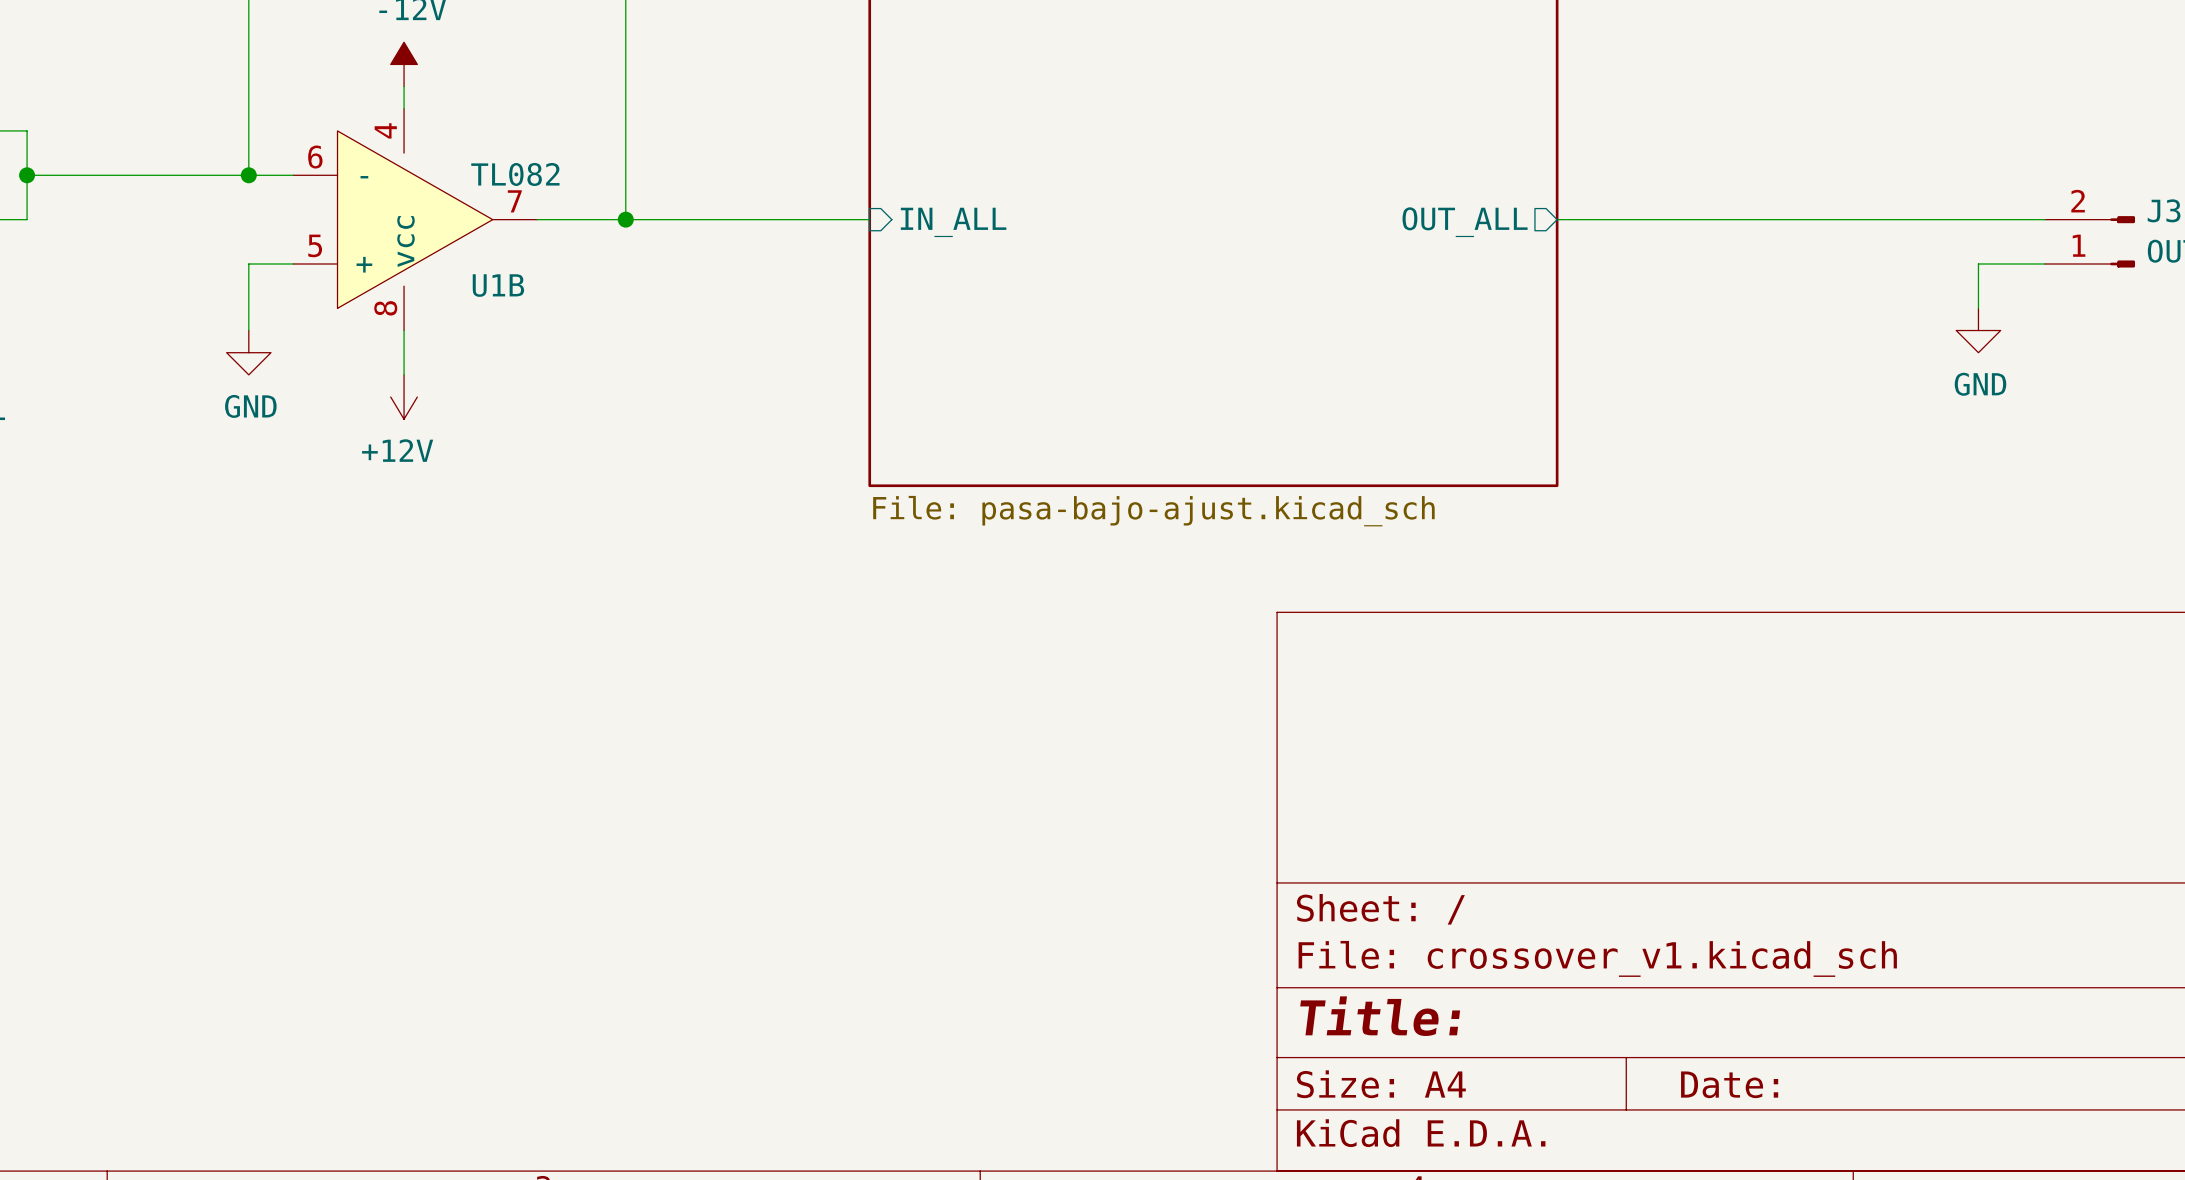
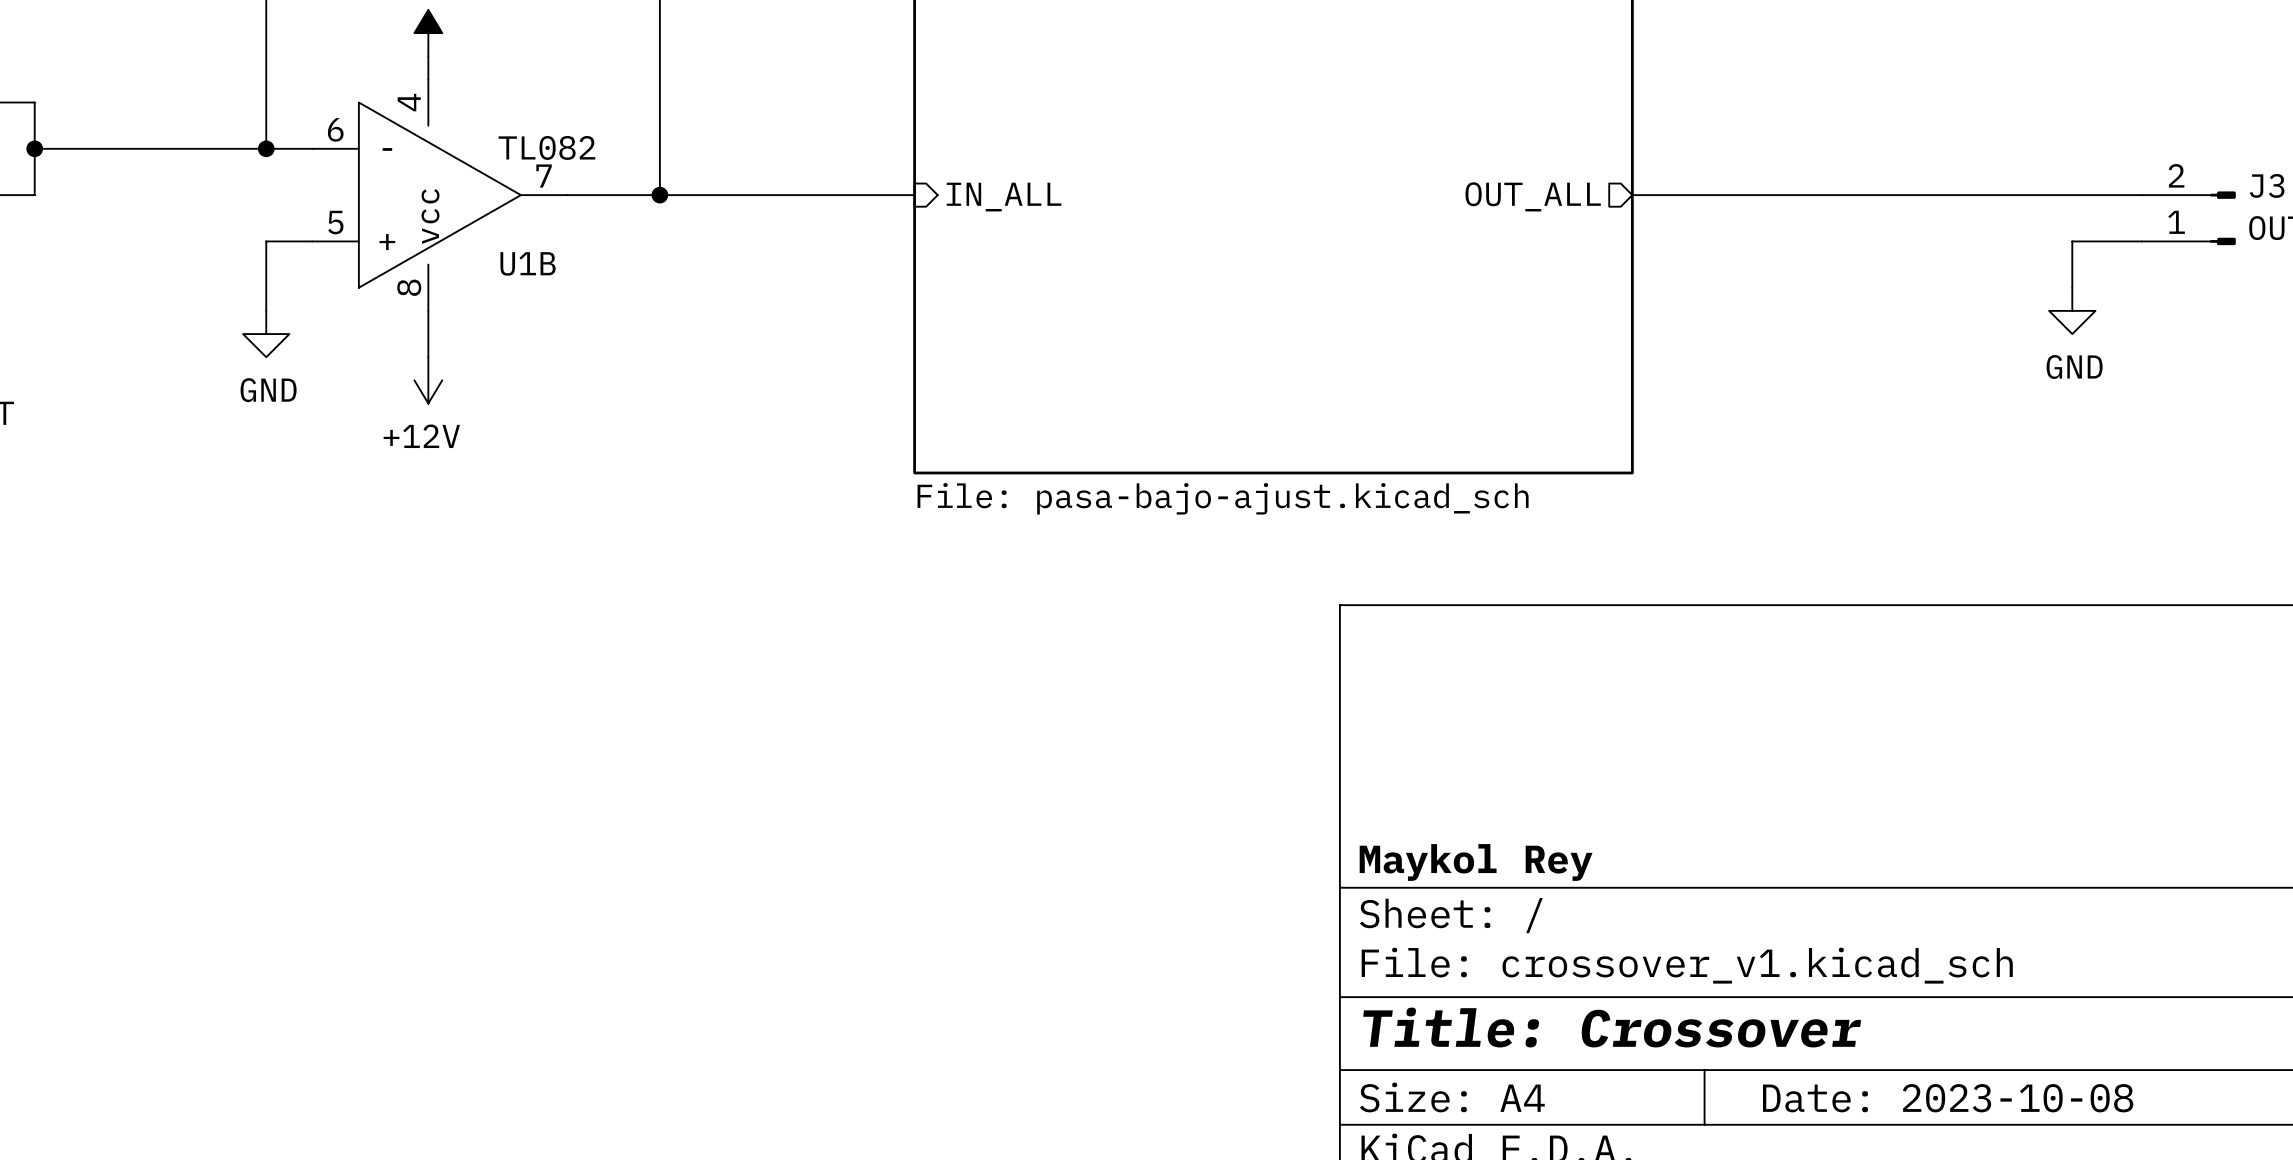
title block: none -> Maykol Rey (1476, 862)
title block: Title: (1380, 1016) -> Title: Crossover (1612, 1027)
title block: Date: (1729, 1084) -> Date: 2023-10-08 (1948, 1098)

